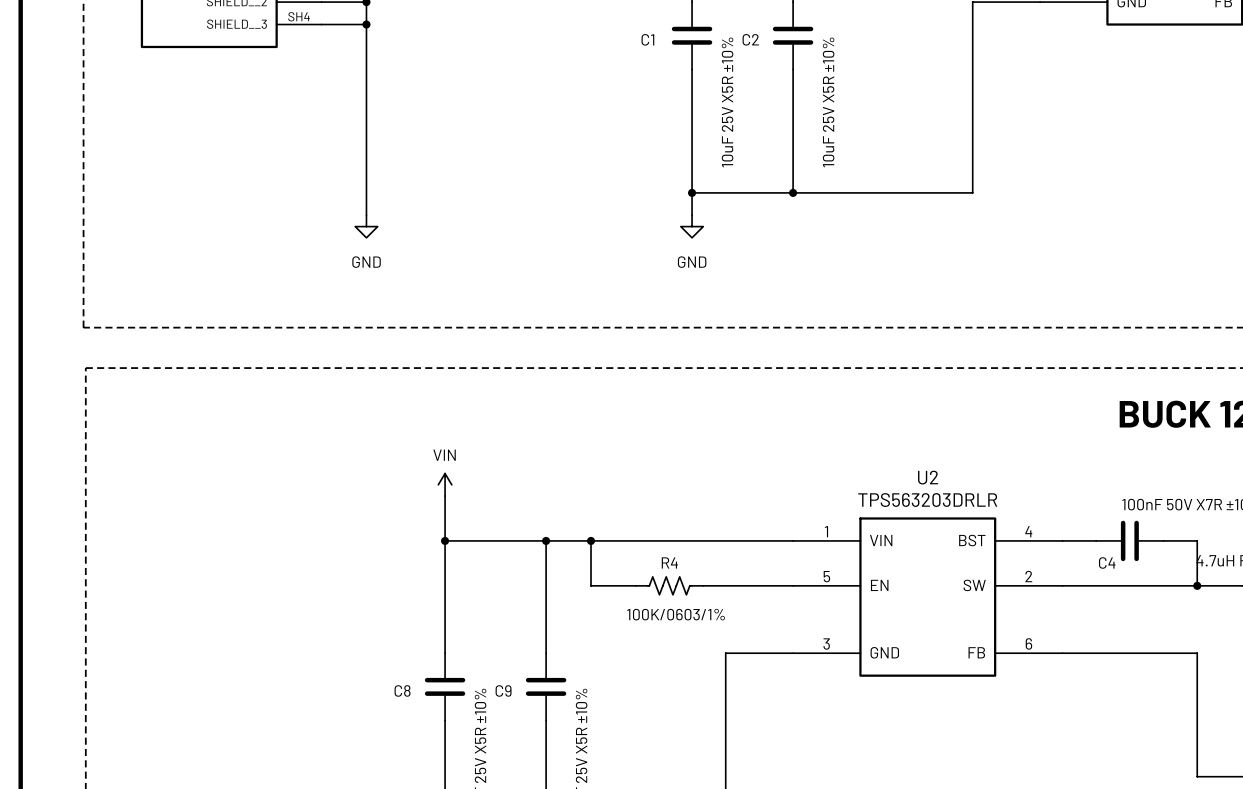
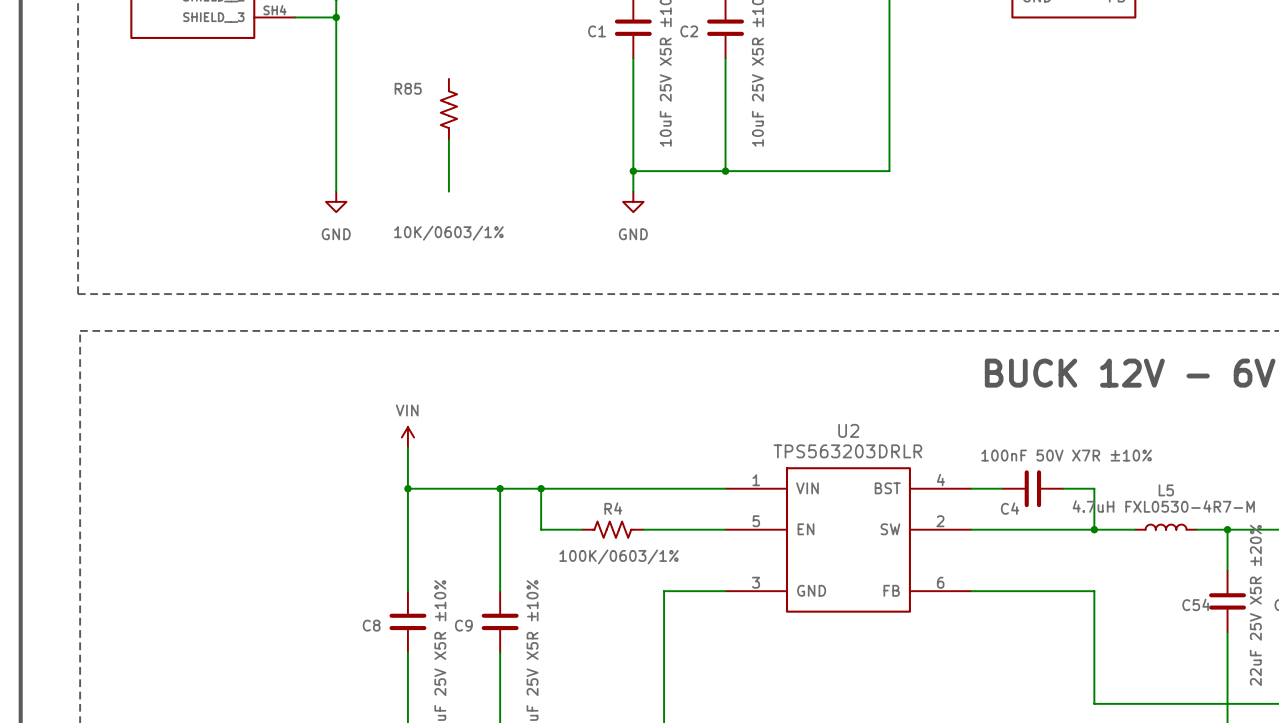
R85: none -> 10K/0603/1% (448, 109)
wire: none -> (448, 140) (448, 191)

